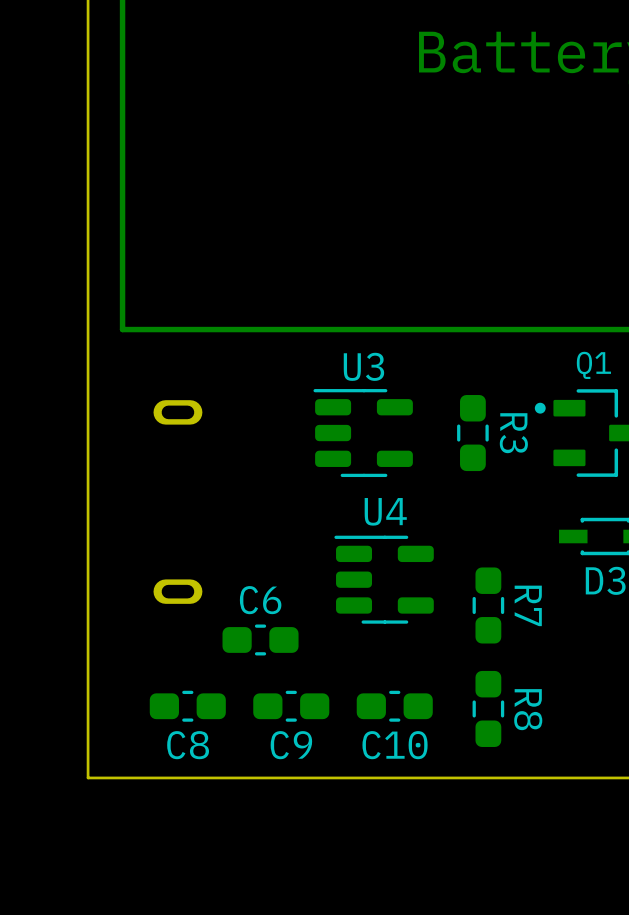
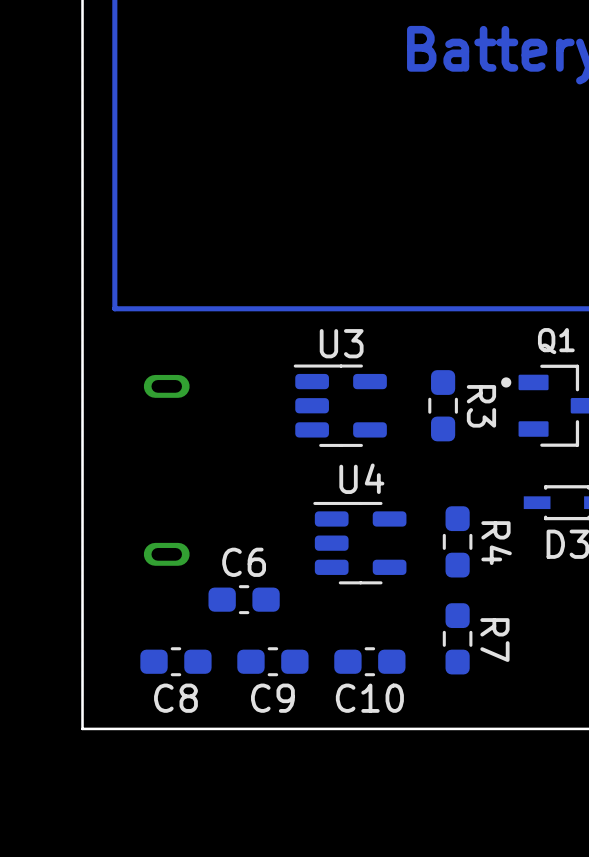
R4: none -> (457, 541)
R7 position: (488, 605) -> (457, 638)
R8: (488, 708) -> none

